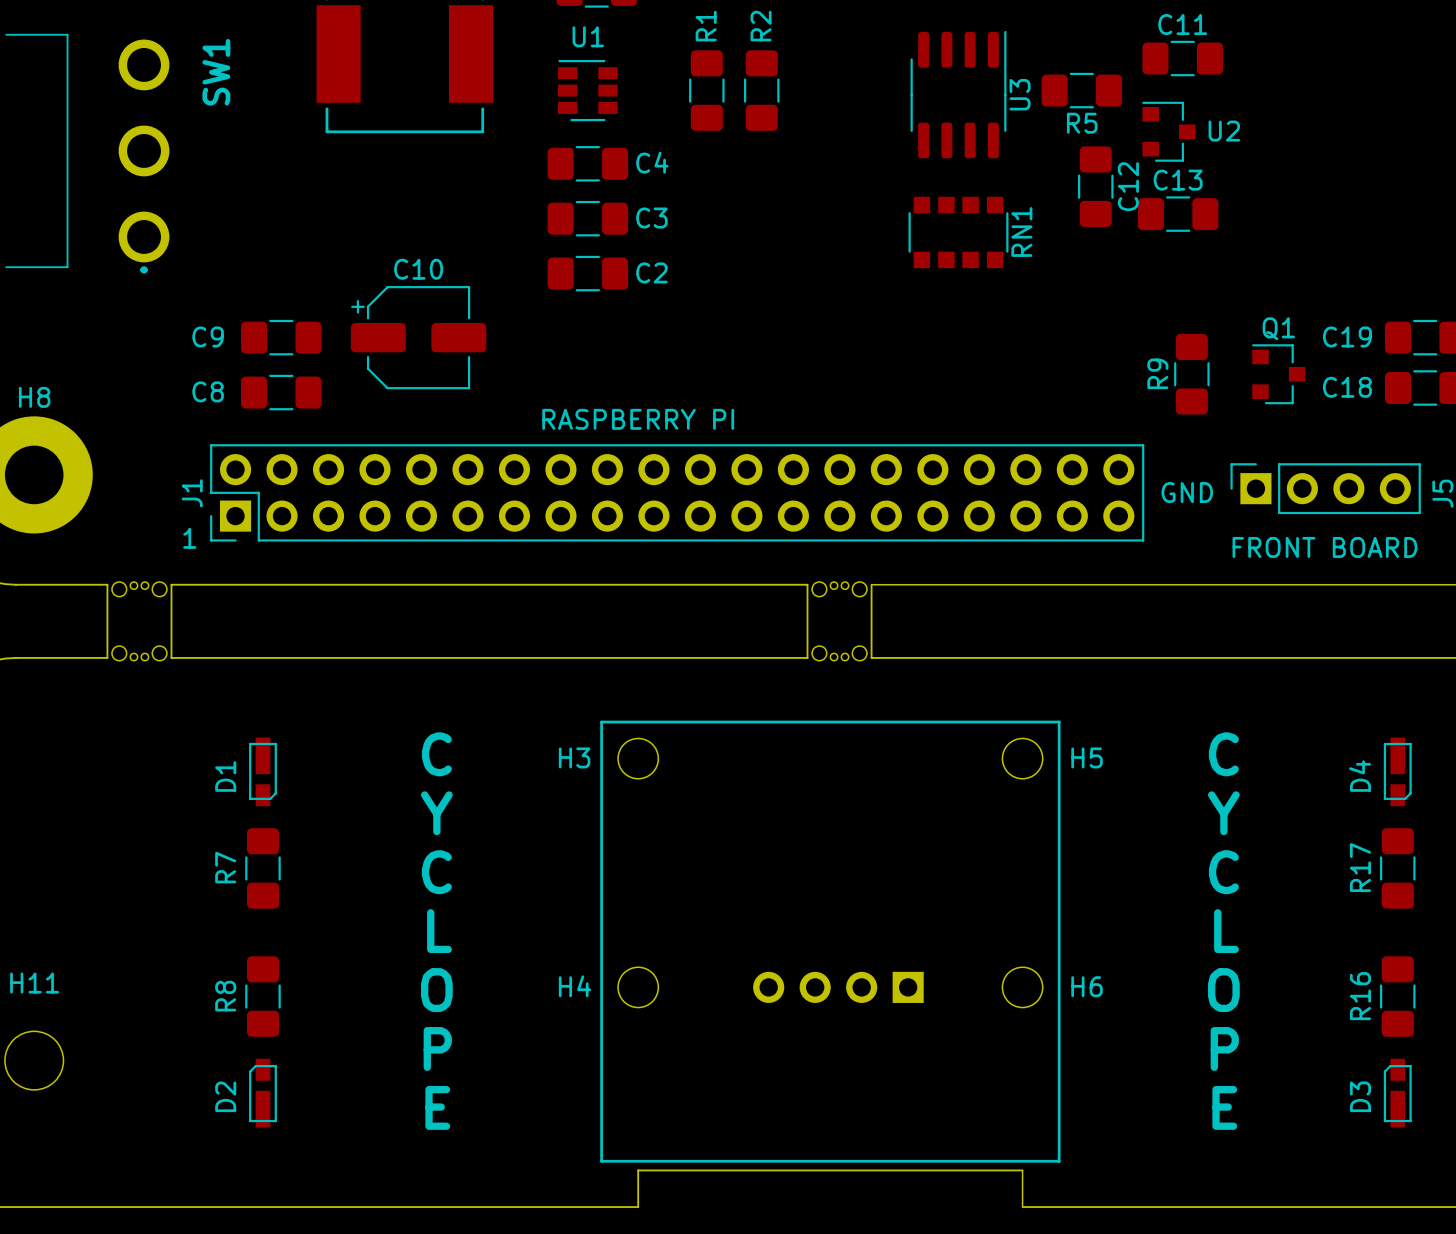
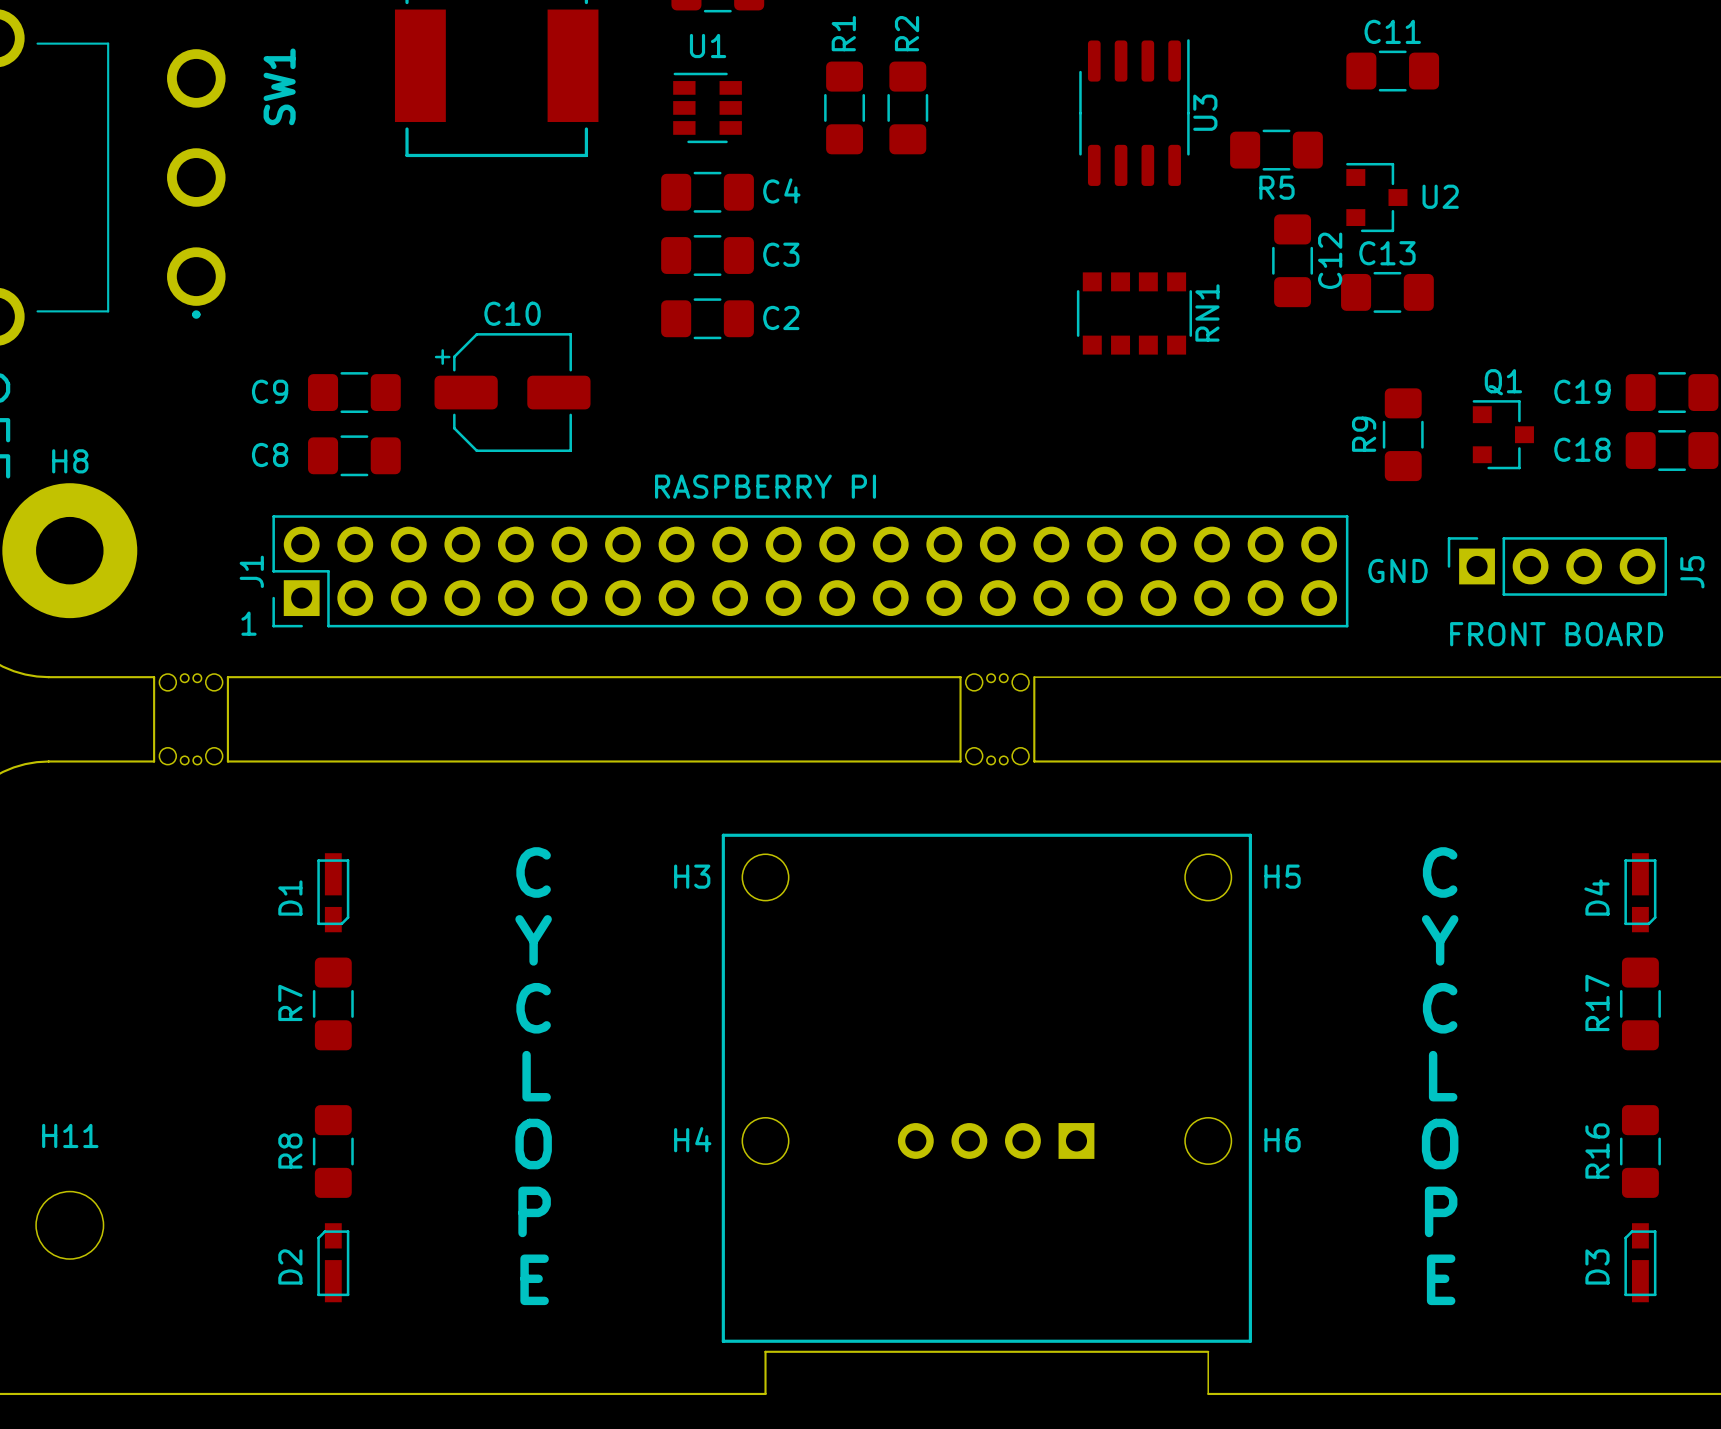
R5 position: (1081, 90) -> (1276, 150)
U2 position: (1168, 131) -> (1376, 197)
C12 position: (1095, 186) -> (1292, 260)
C13 position: (1178, 214) -> (1387, 292)
RN1 position: (958, 232) -> (1134, 313)

